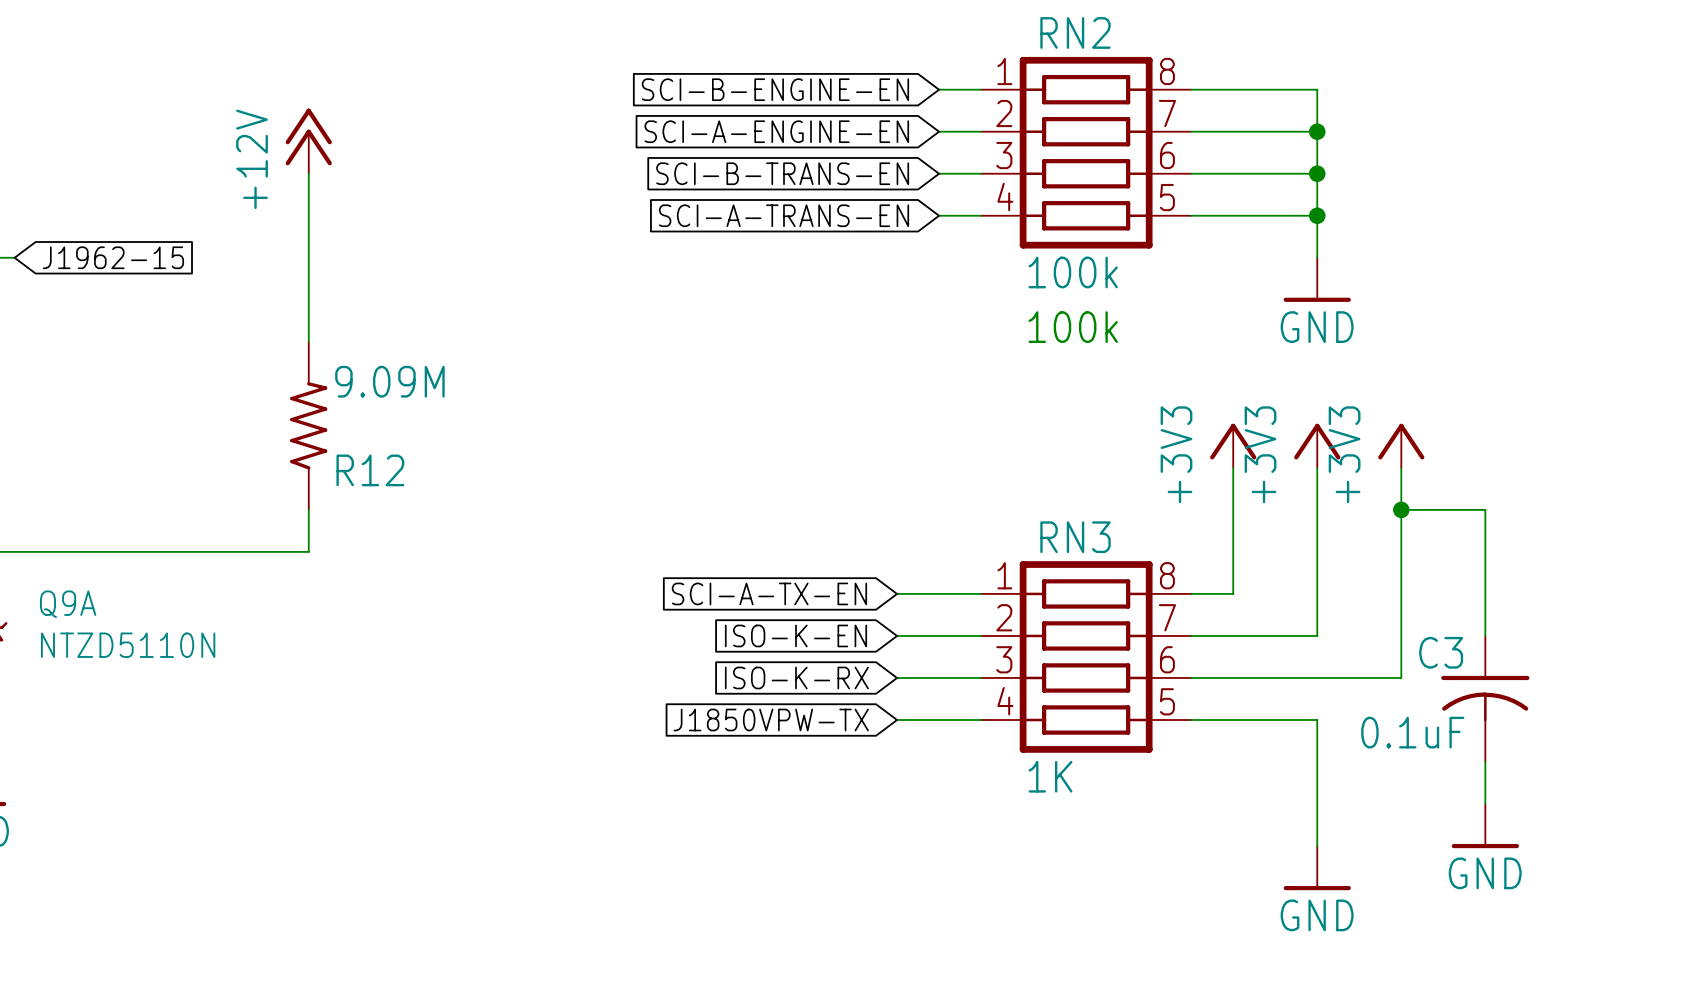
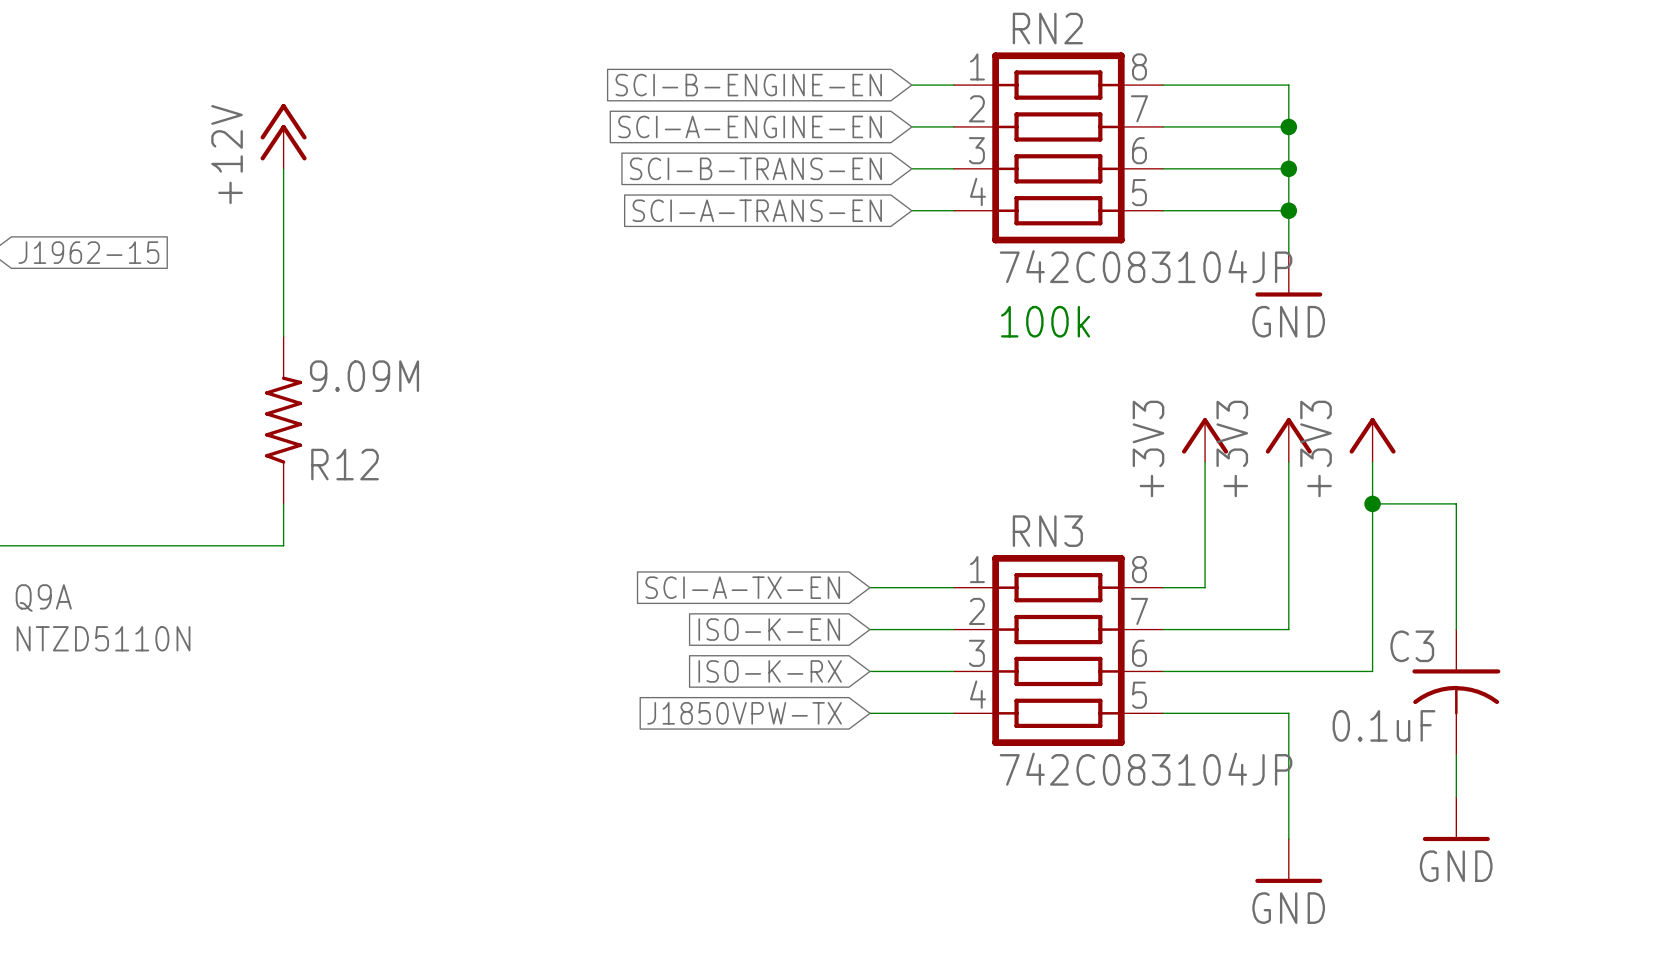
RN2 value: 100k (1073, 272) -> 742C083104JP (1146, 266)
RN3 value: 1K (1050, 776) -> 742C083104JP (1146, 769)

